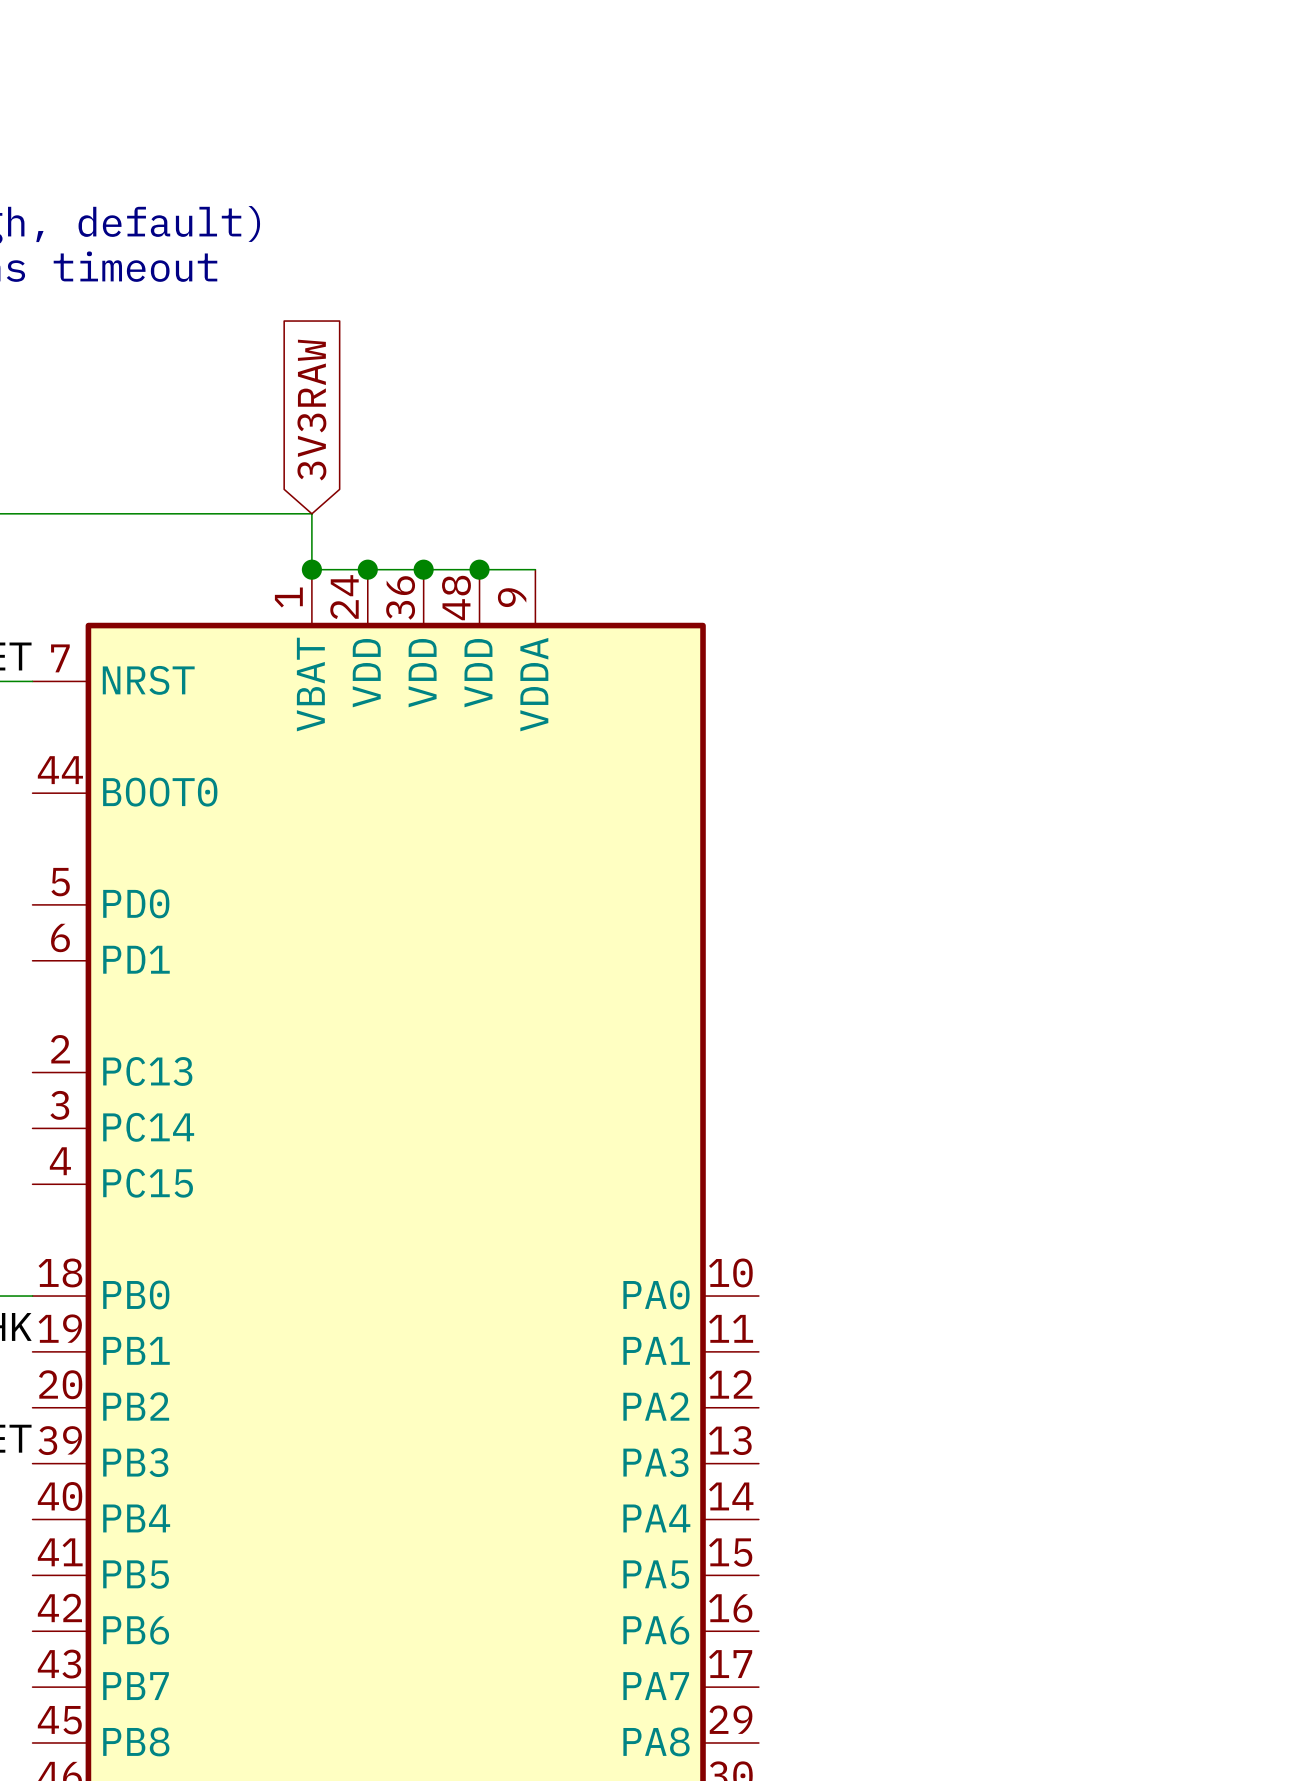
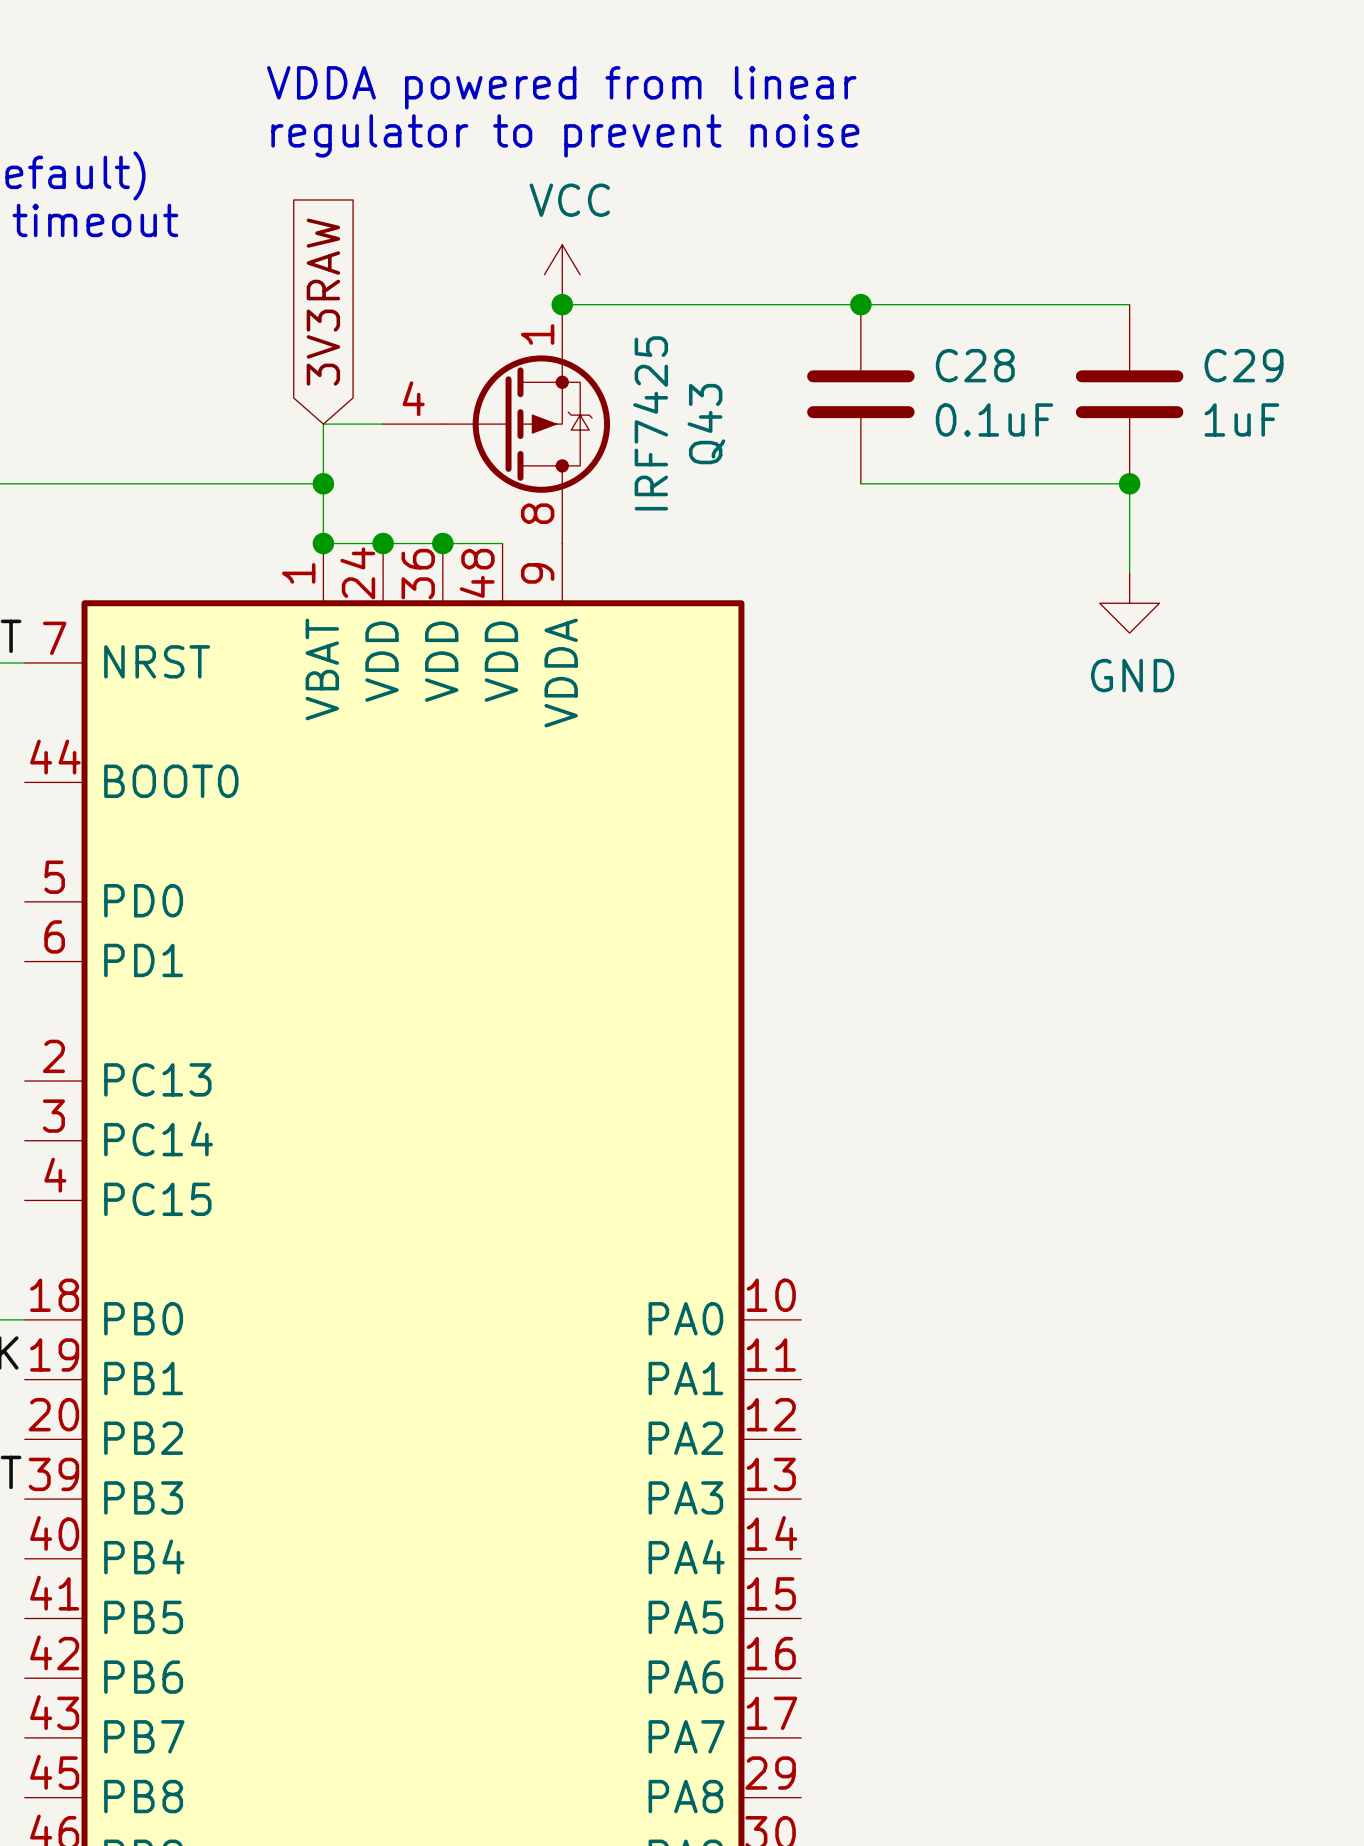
text: none -> VDDA powered from linear (561, 87)
text: none -> regulator to prevent noise (565, 135)
power symbol: none -> VCC (562, 274)
wire: none -> (562, 304) (1129, 304)
junction: none -> (562, 304)
junction: none -> (860, 304)
global label position: 3V3RAW (311, 410) -> 3V3RAW (323, 302)
C28: none -> 0.1uF (860, 394)
C29: none -> 1uF (1129, 394)
wire: none -> (383, 424) (323, 424) (323, 483)
Q43: none -> IRF7425 (496, 424)
junction: none -> (323, 483)
wire: none -> (860, 483) (1129, 483) (1129, 573)
junction: none -> (1129, 483)
wire: (479, 569) (535, 569) -> none
junction: (479, 569) -> none
power symbol: none -> GND (1129, 603)

